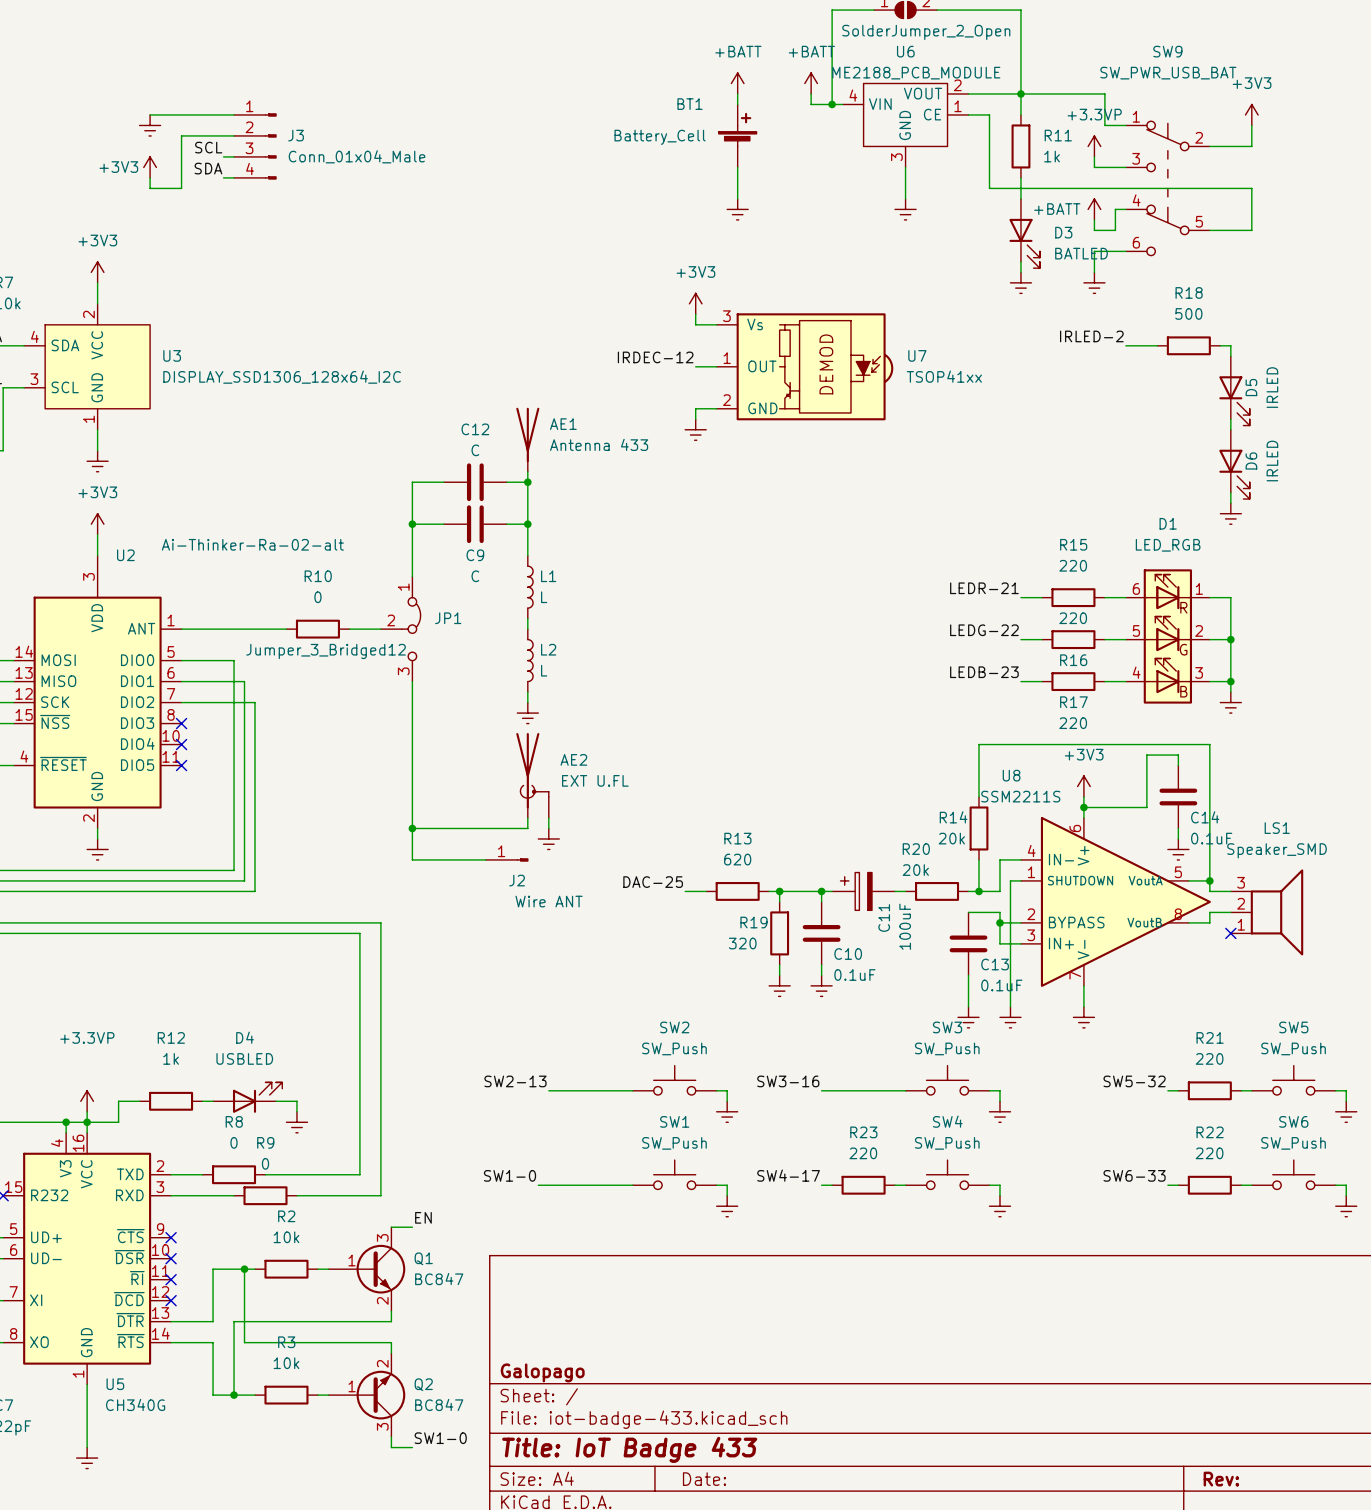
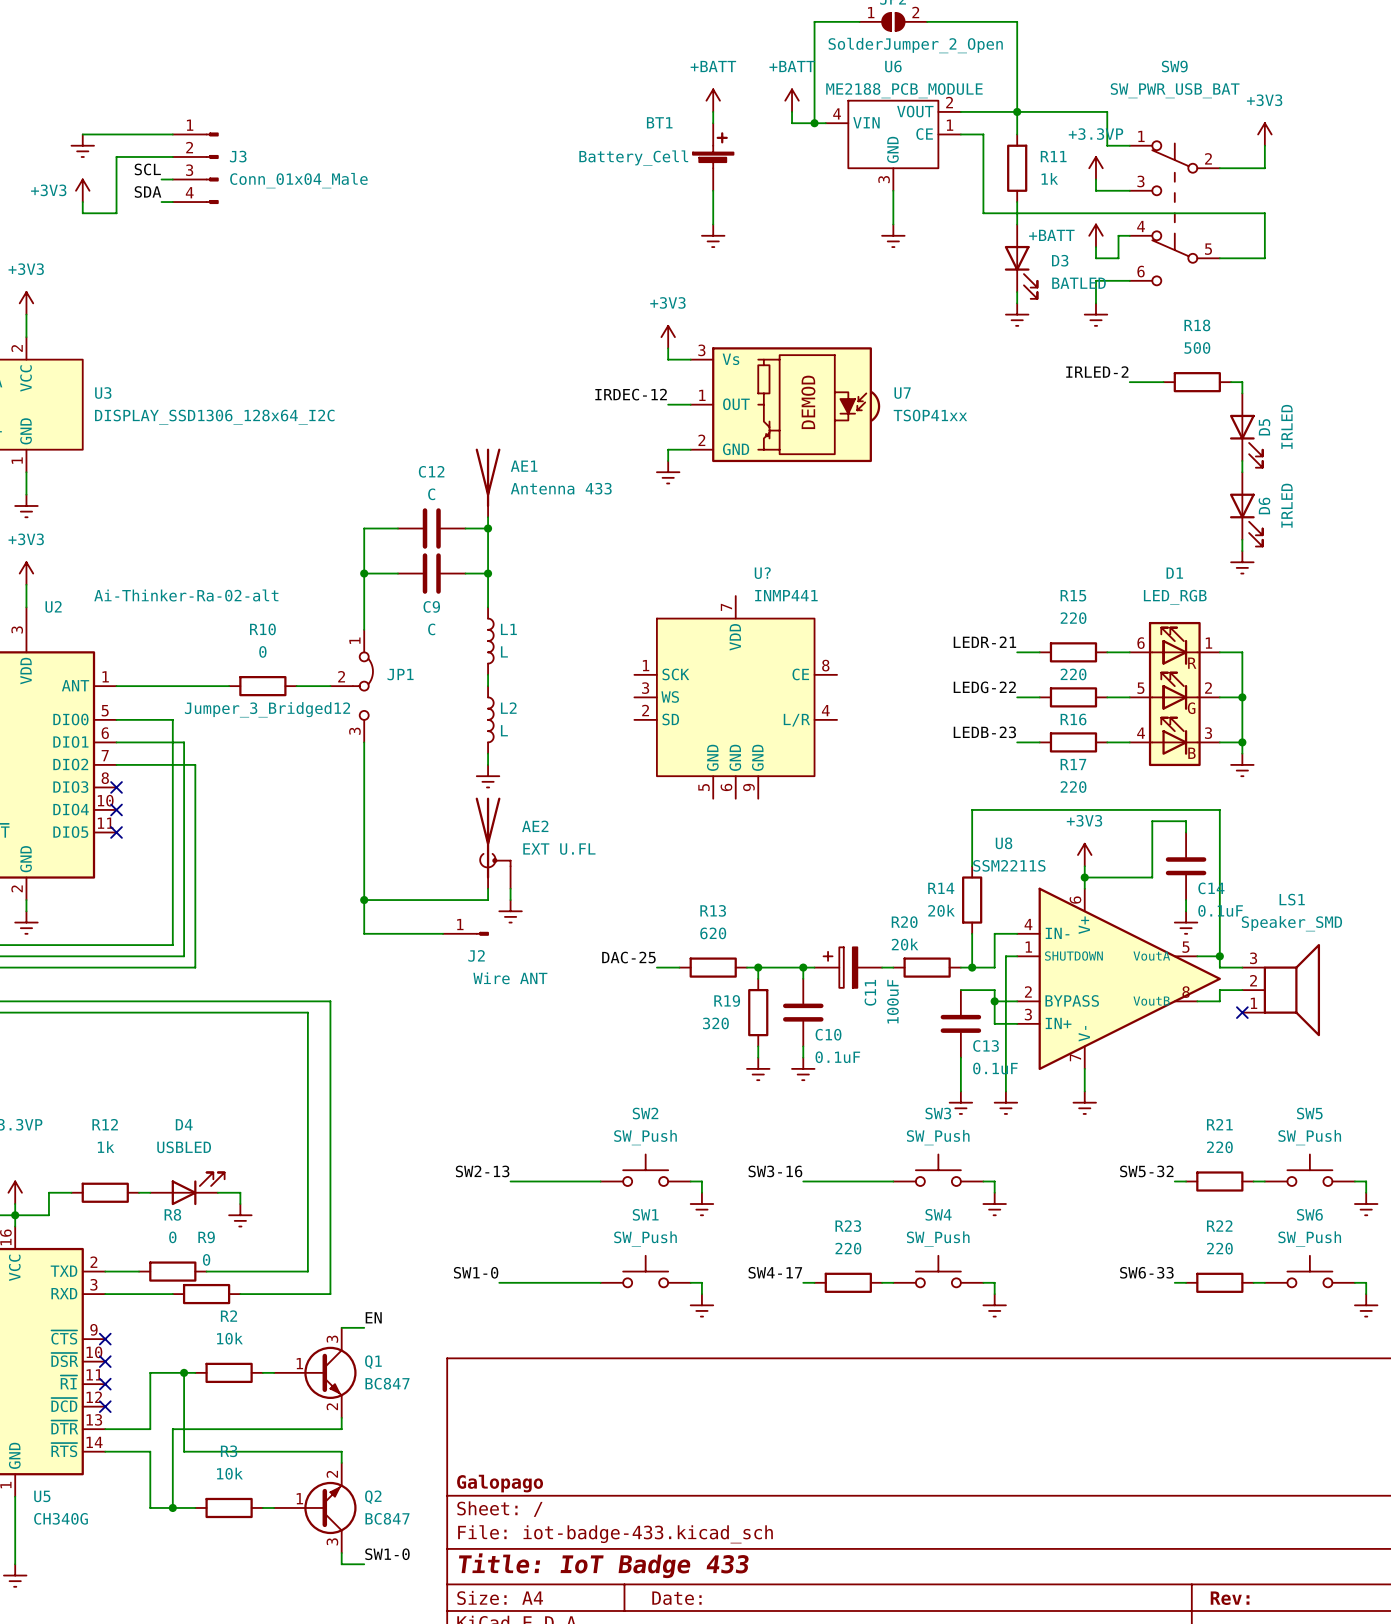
U?: none -> INMP441 (735, 697)

